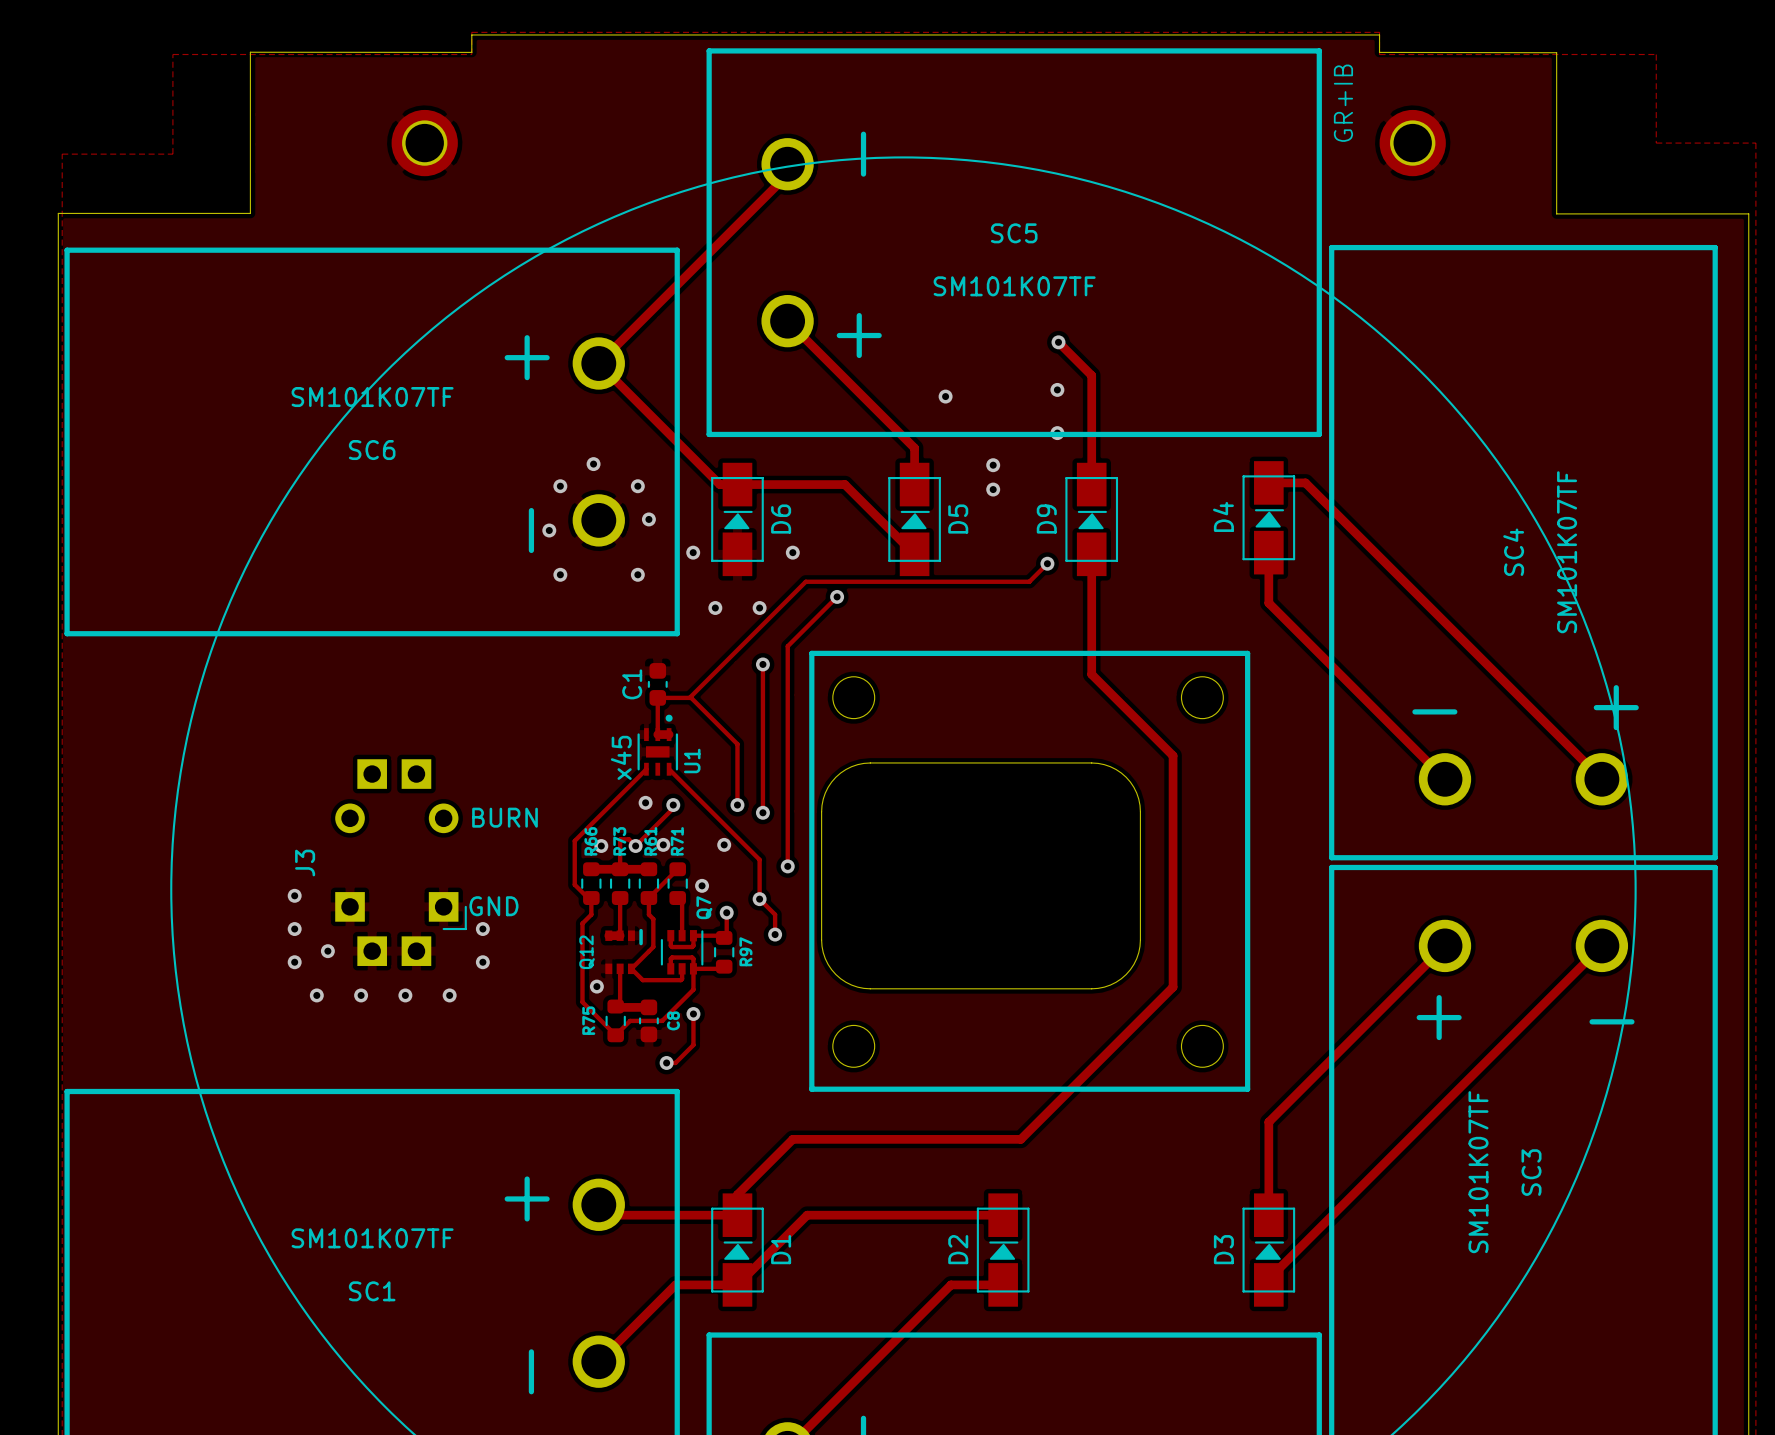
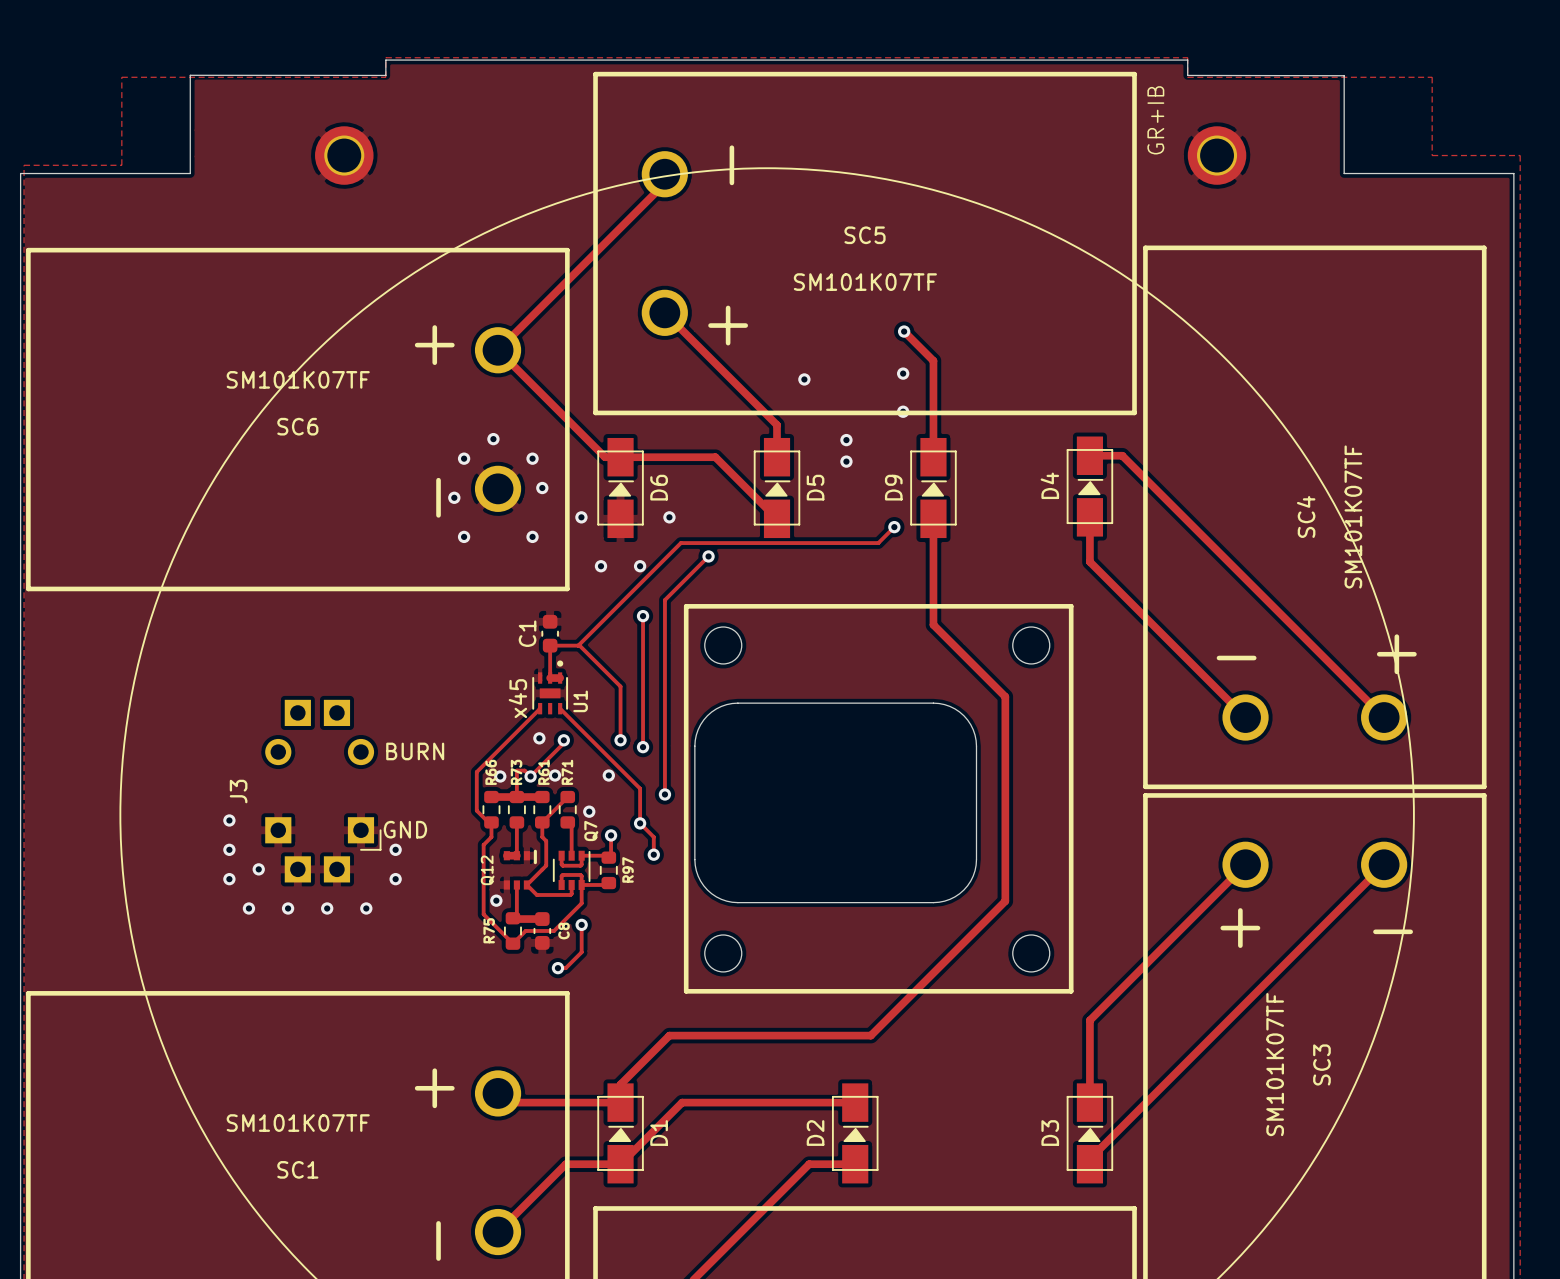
board edge: (250, 163) (250, 213) (58, 213) -> (190, 173) (20, 173) (20, 217)
board edge: (1556, 163) (1556, 213) (1748, 213) -> (1344, 173) (1513, 173) (1513, 218)

